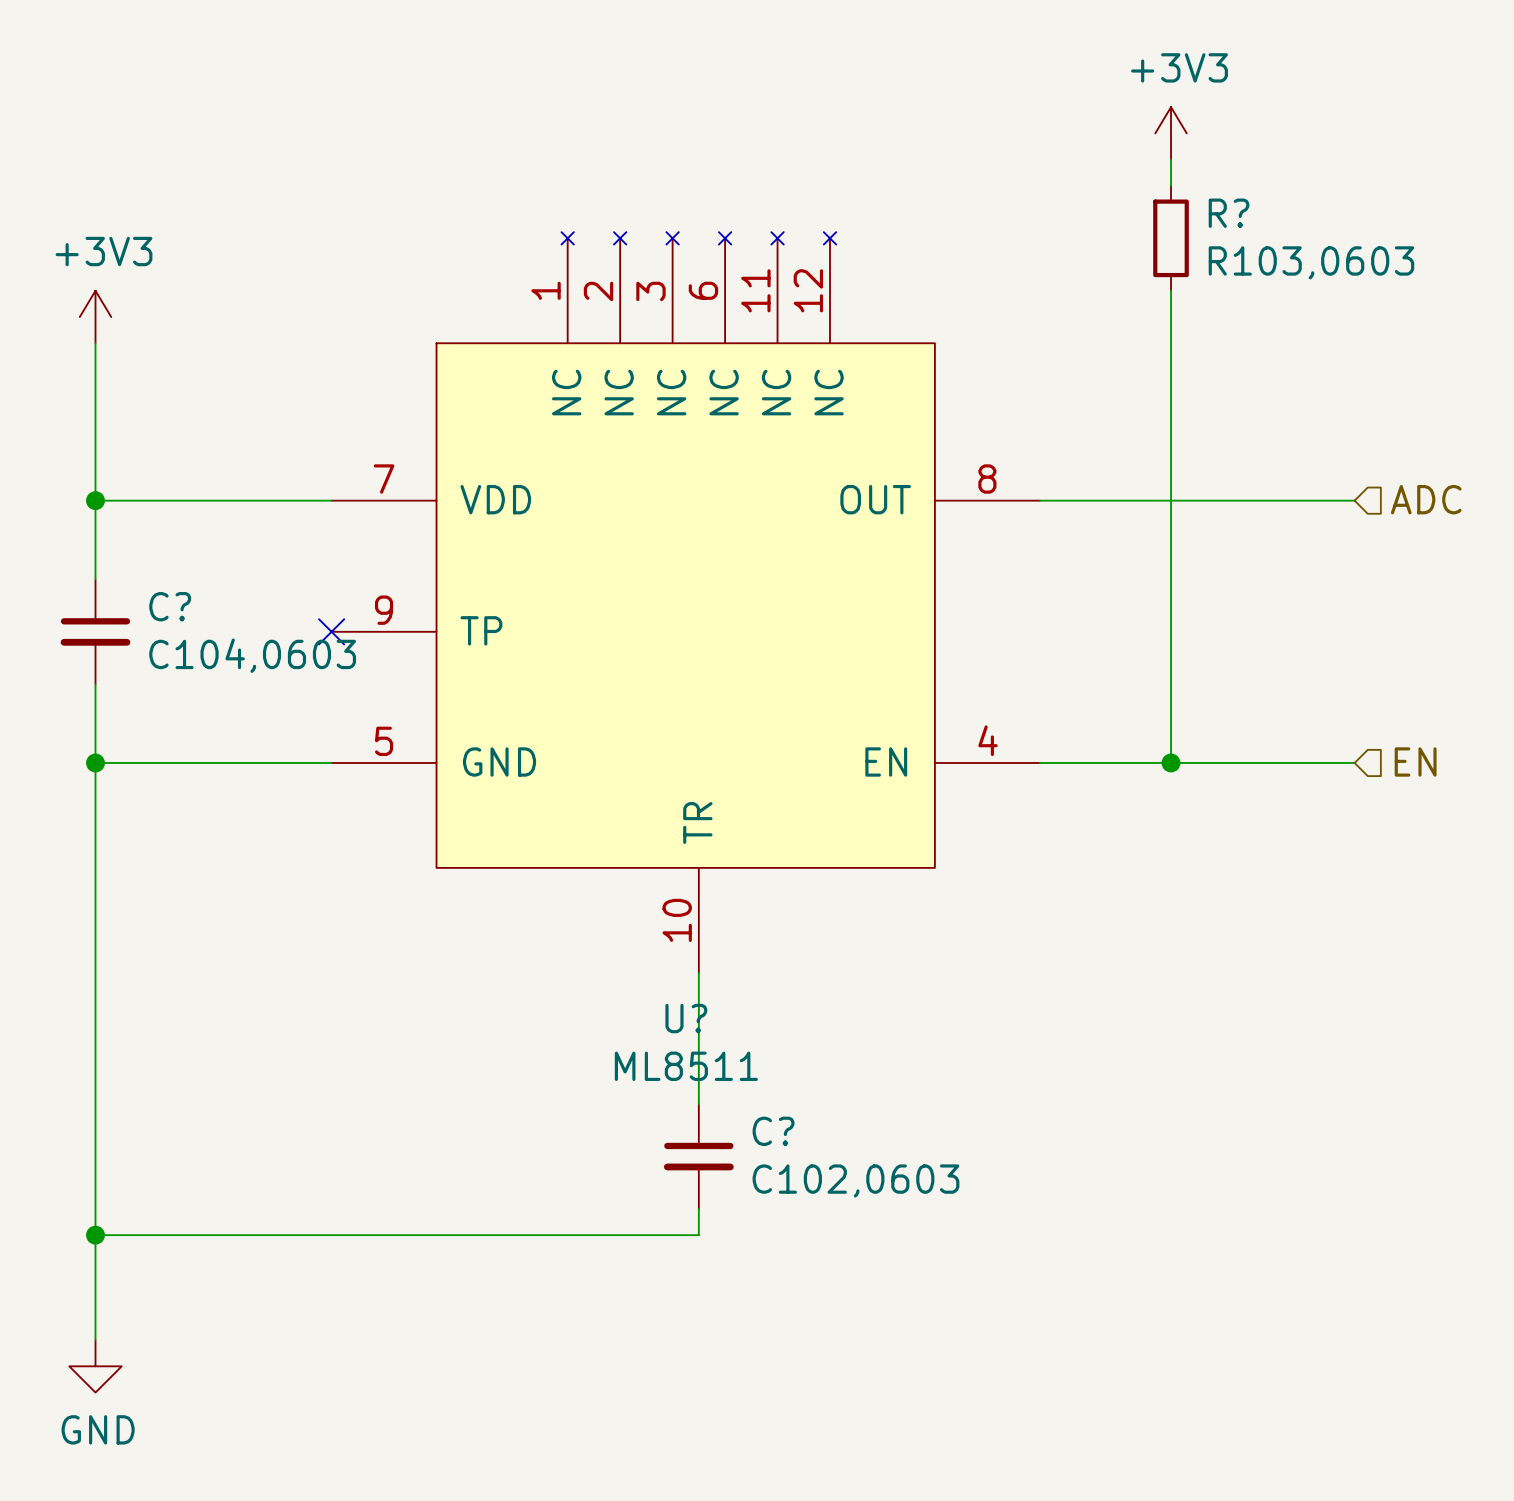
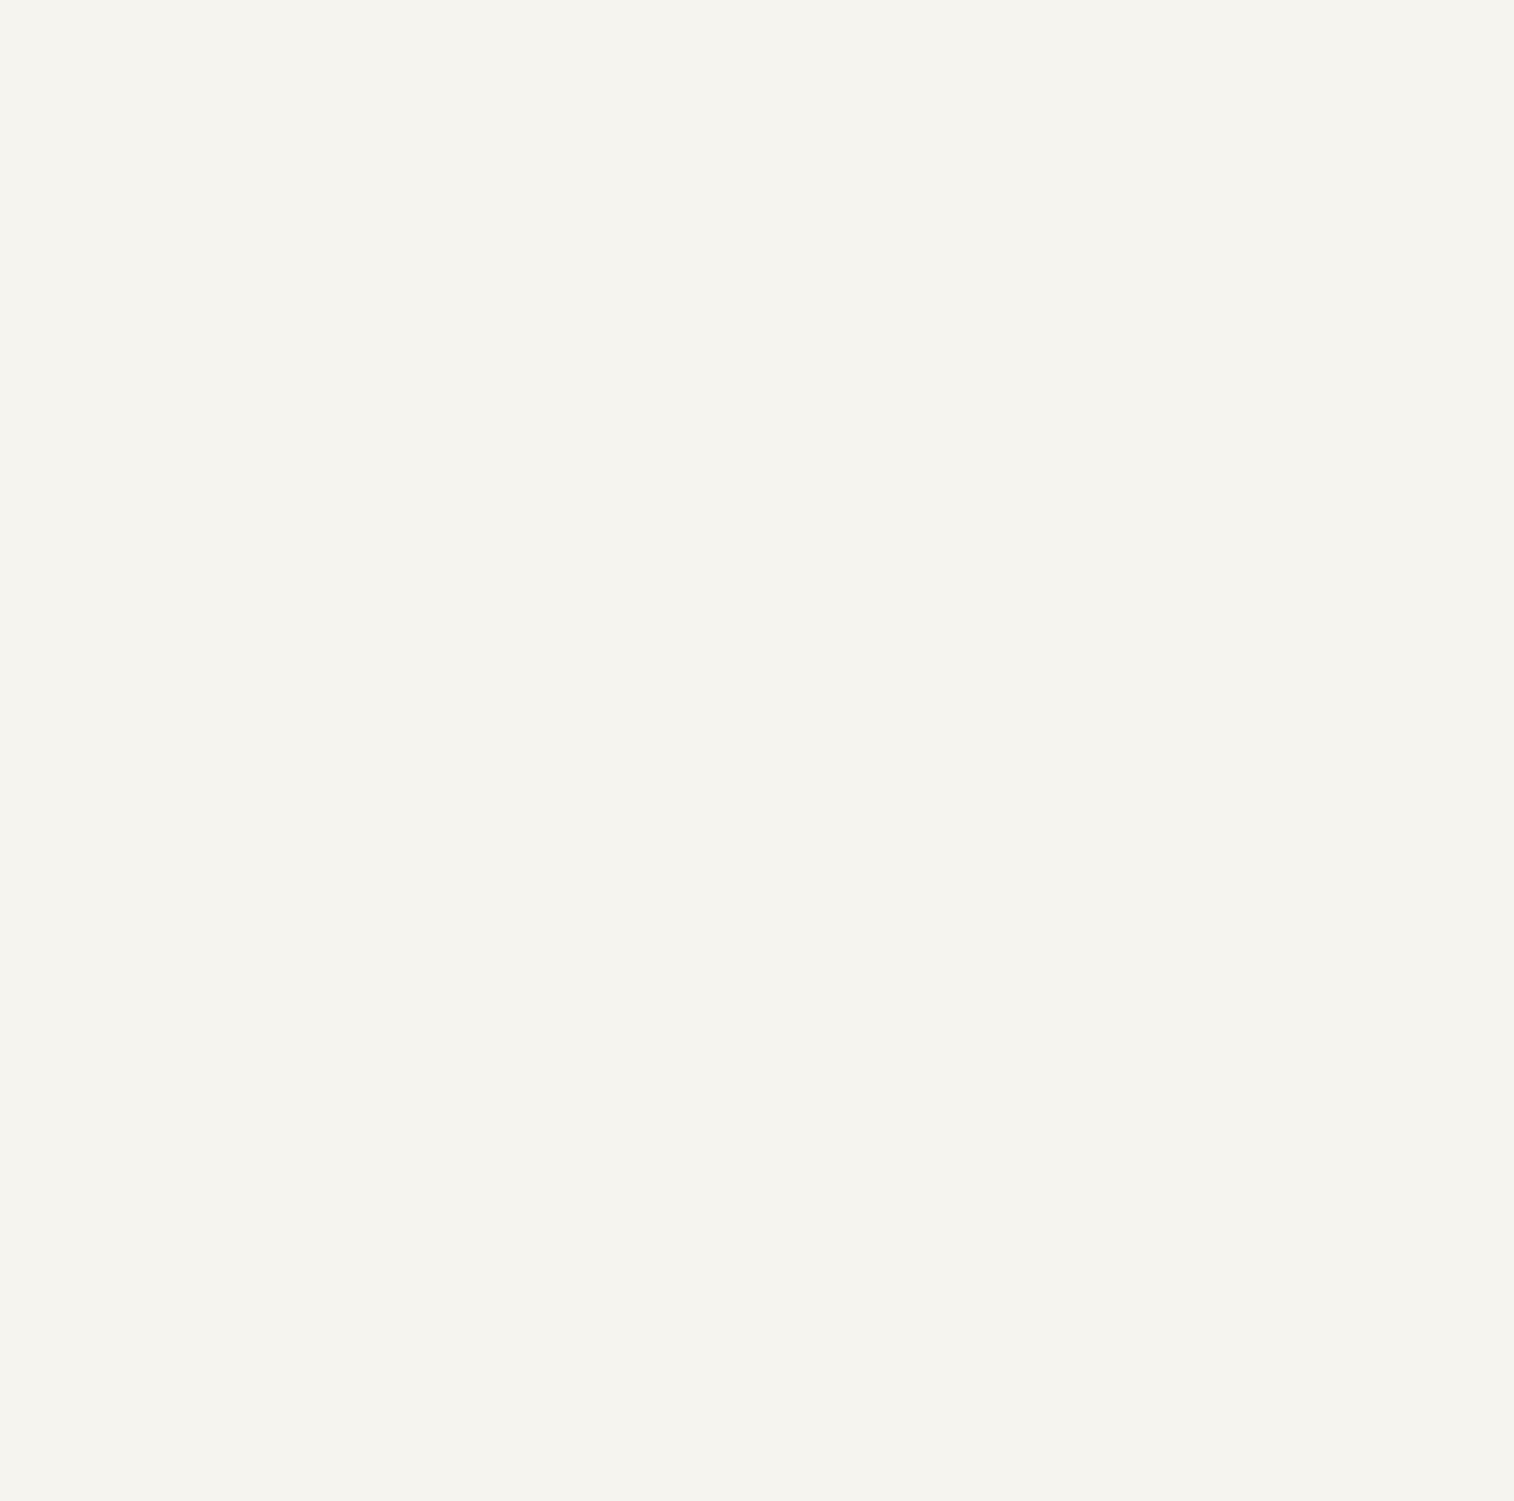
power symbol: +3V3 (1171, 133) -> none
wire: (1171, 159) (1171, 185) -> none
R?: R103,0603 (1171, 238) -> none
wire: (1171, 290) (1171, 762) -> none
power symbol: +3V3 (95, 317) -> none
wire: (95, 343) (95, 579) -> none
hierarchical label: ADC (1426, 499) -> none
wire: (95, 500) (331, 500) -> none
junction: (95, 500) -> none
wire: (1039, 500) (1354, 500) -> none
U?: ML8511 (685, 602) -> none
C?: C104,0603 (95, 631) -> none
no-connect mark: (331, 631) -> none
wire: (95, 684) (95, 1340) -> none
hierarchical label: EN (1415, 761) -> none
wire: (95, 762) (331, 762) -> none
junction: (95, 762) -> none
wire: (1039, 762) (1354, 762) -> none
junction: (1171, 762) -> none
wire: (698, 972) (698, 1103) -> none
C?: C102,0603 (698, 1156) -> none
wire: (698, 1208) (698, 1235) (95, 1235) -> none
junction: (95, 1235) -> none
power symbol: GND (95, 1366) -> none

